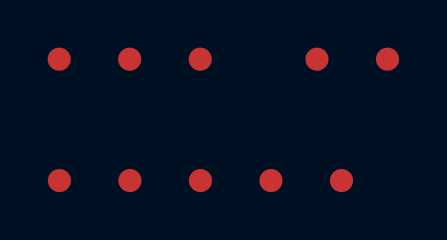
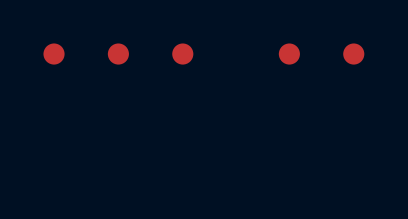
part: (59, 180) -> none
part: (129, 180) -> none
part: (200, 180) -> none
part: (270, 180) -> none
part: (341, 180) -> none

